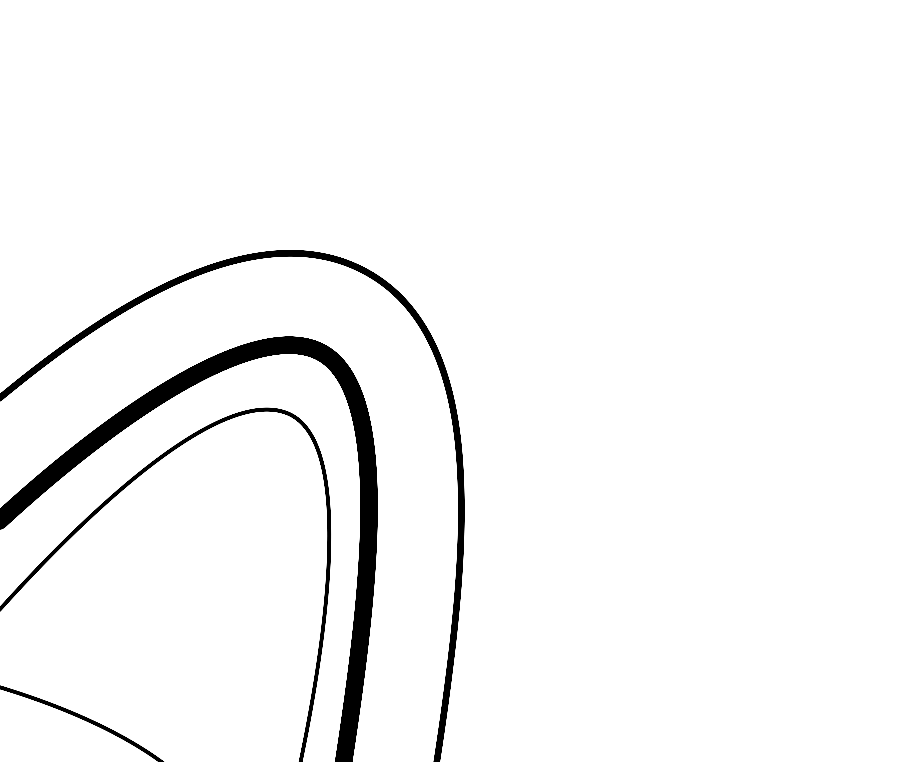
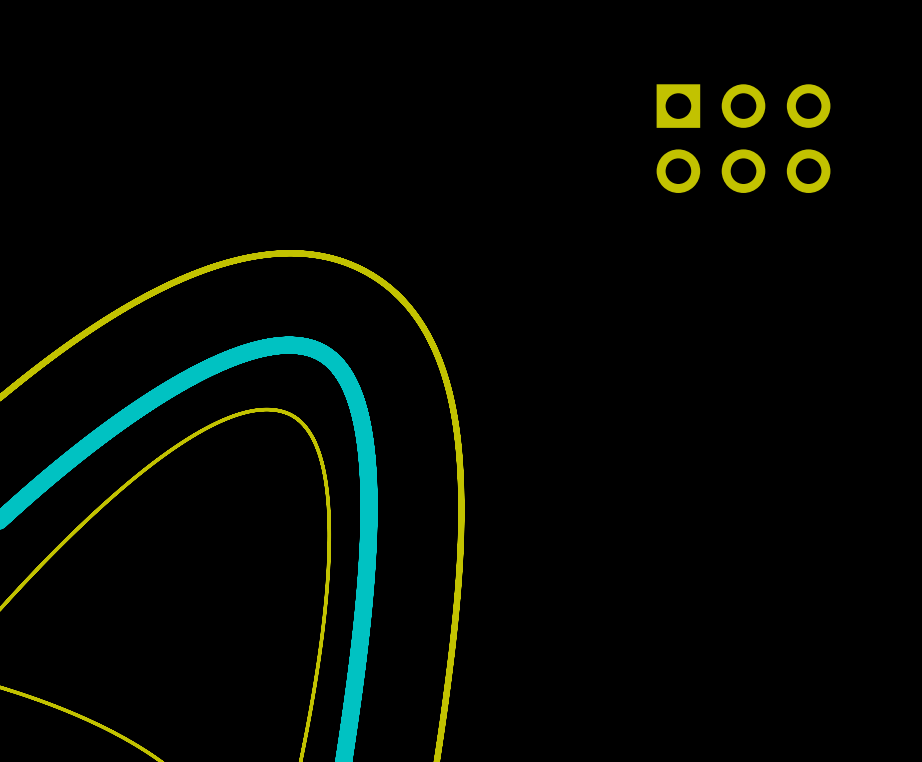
part: none -> (743, 138)

